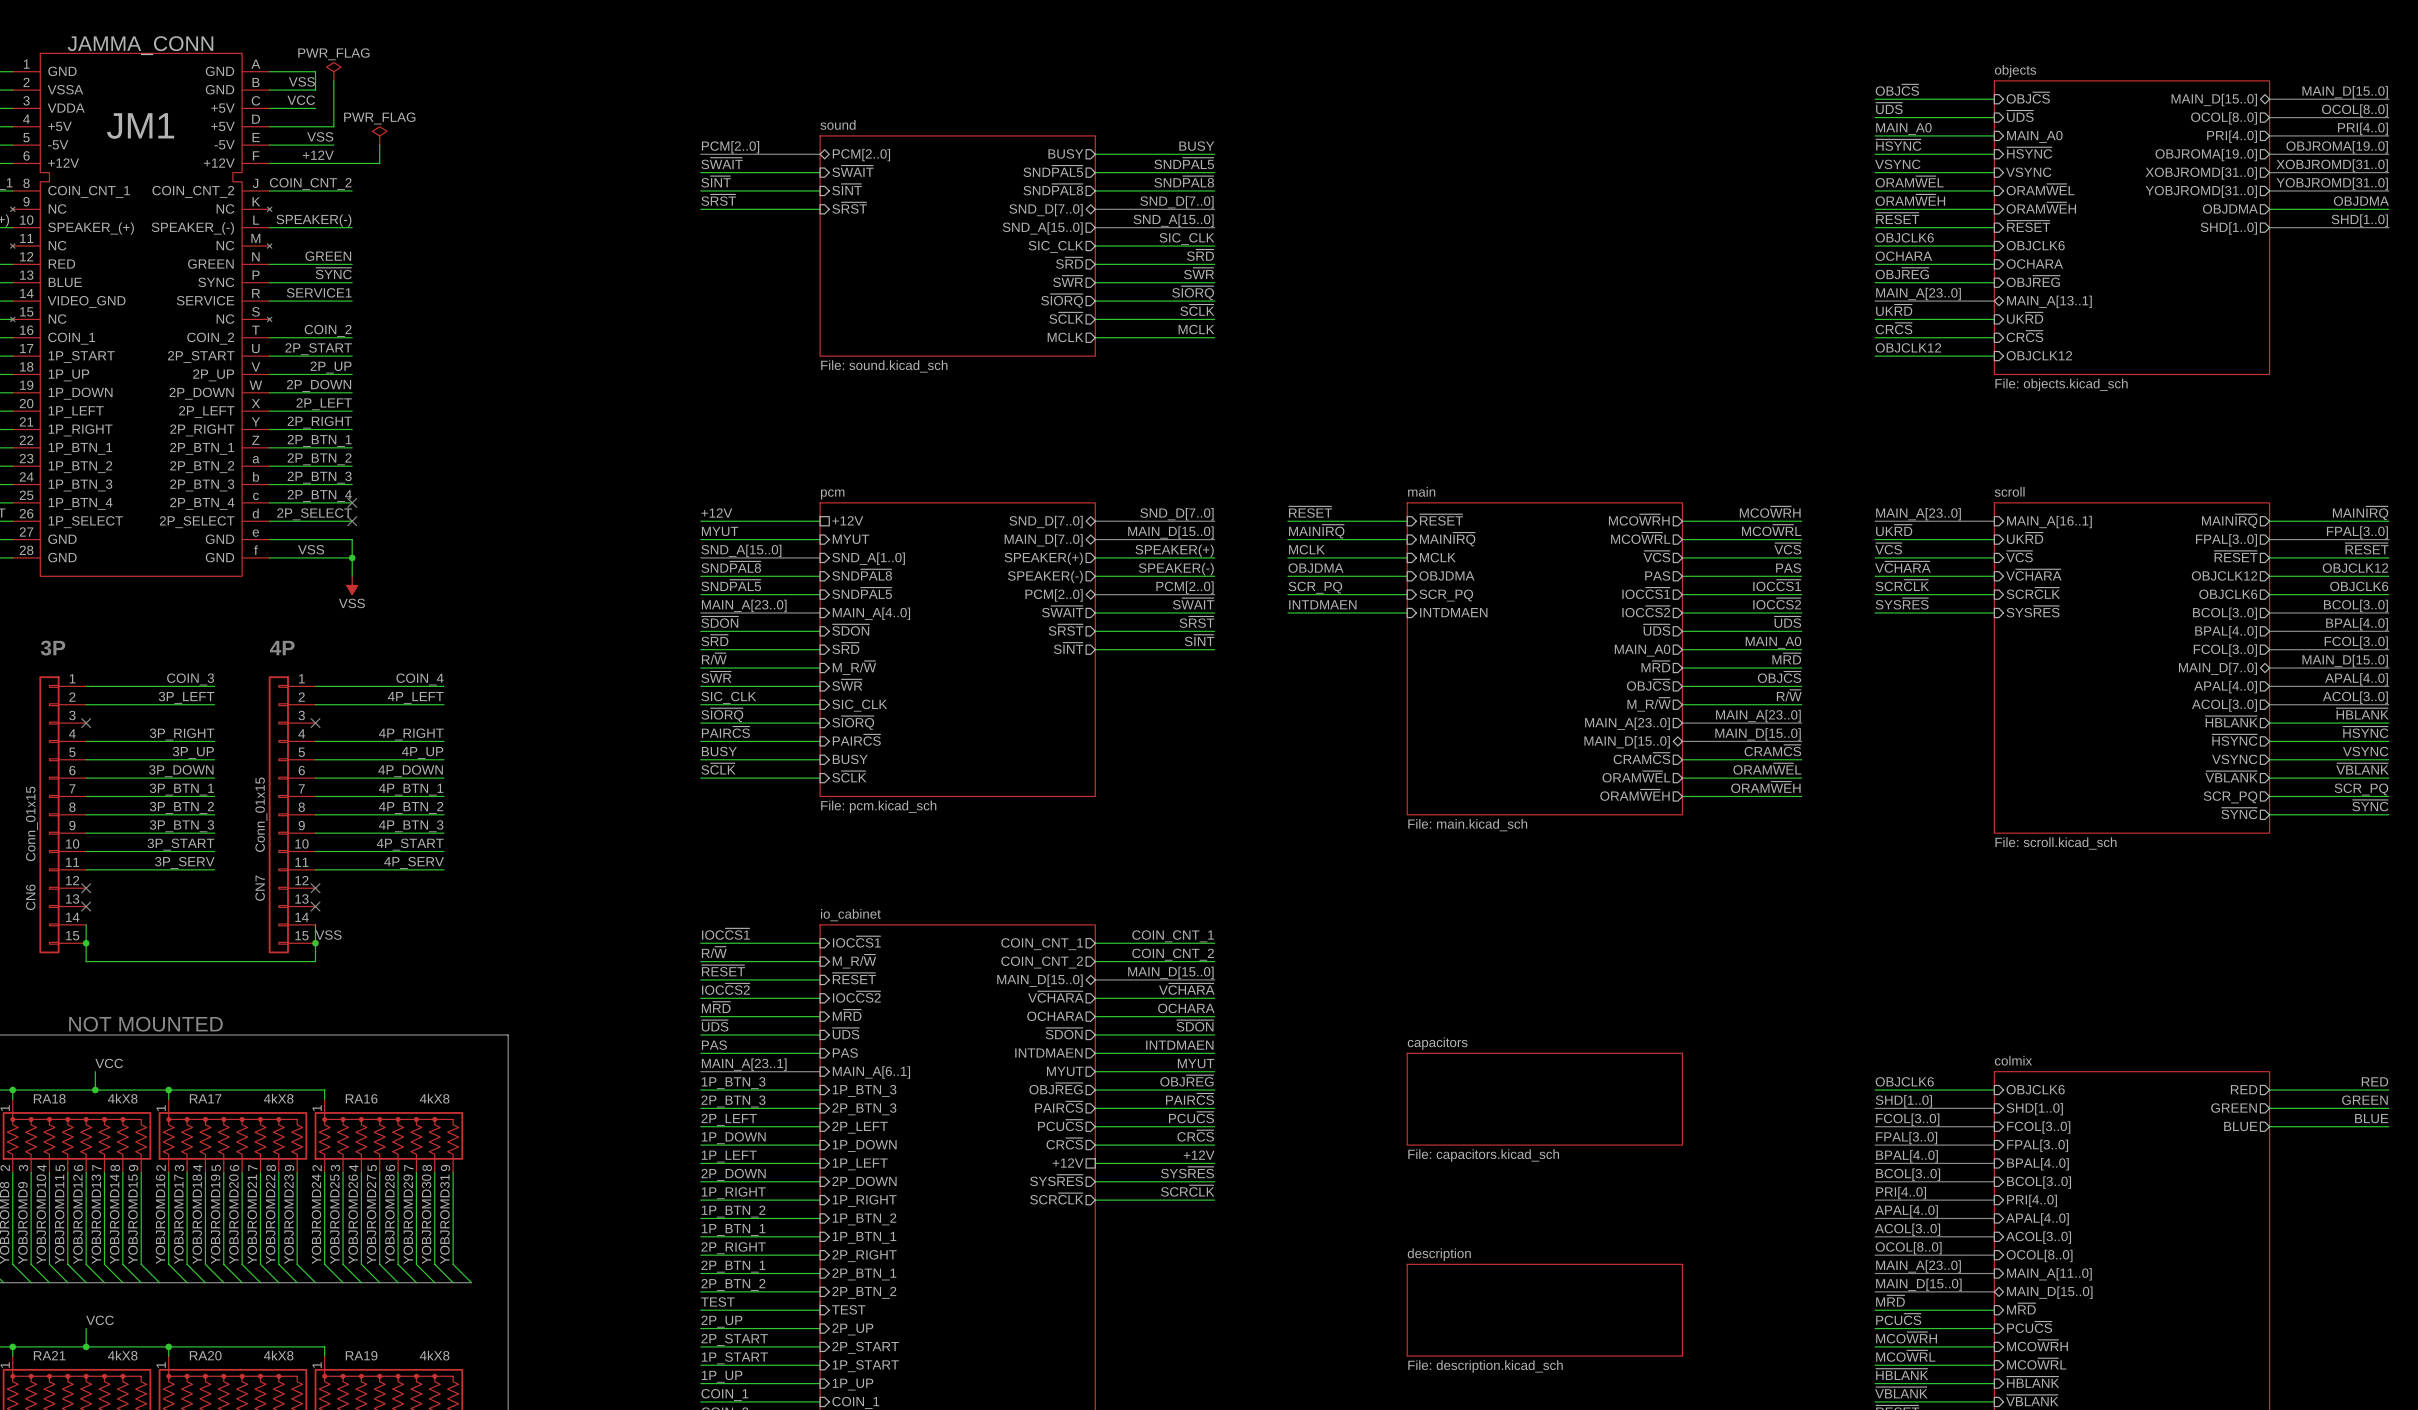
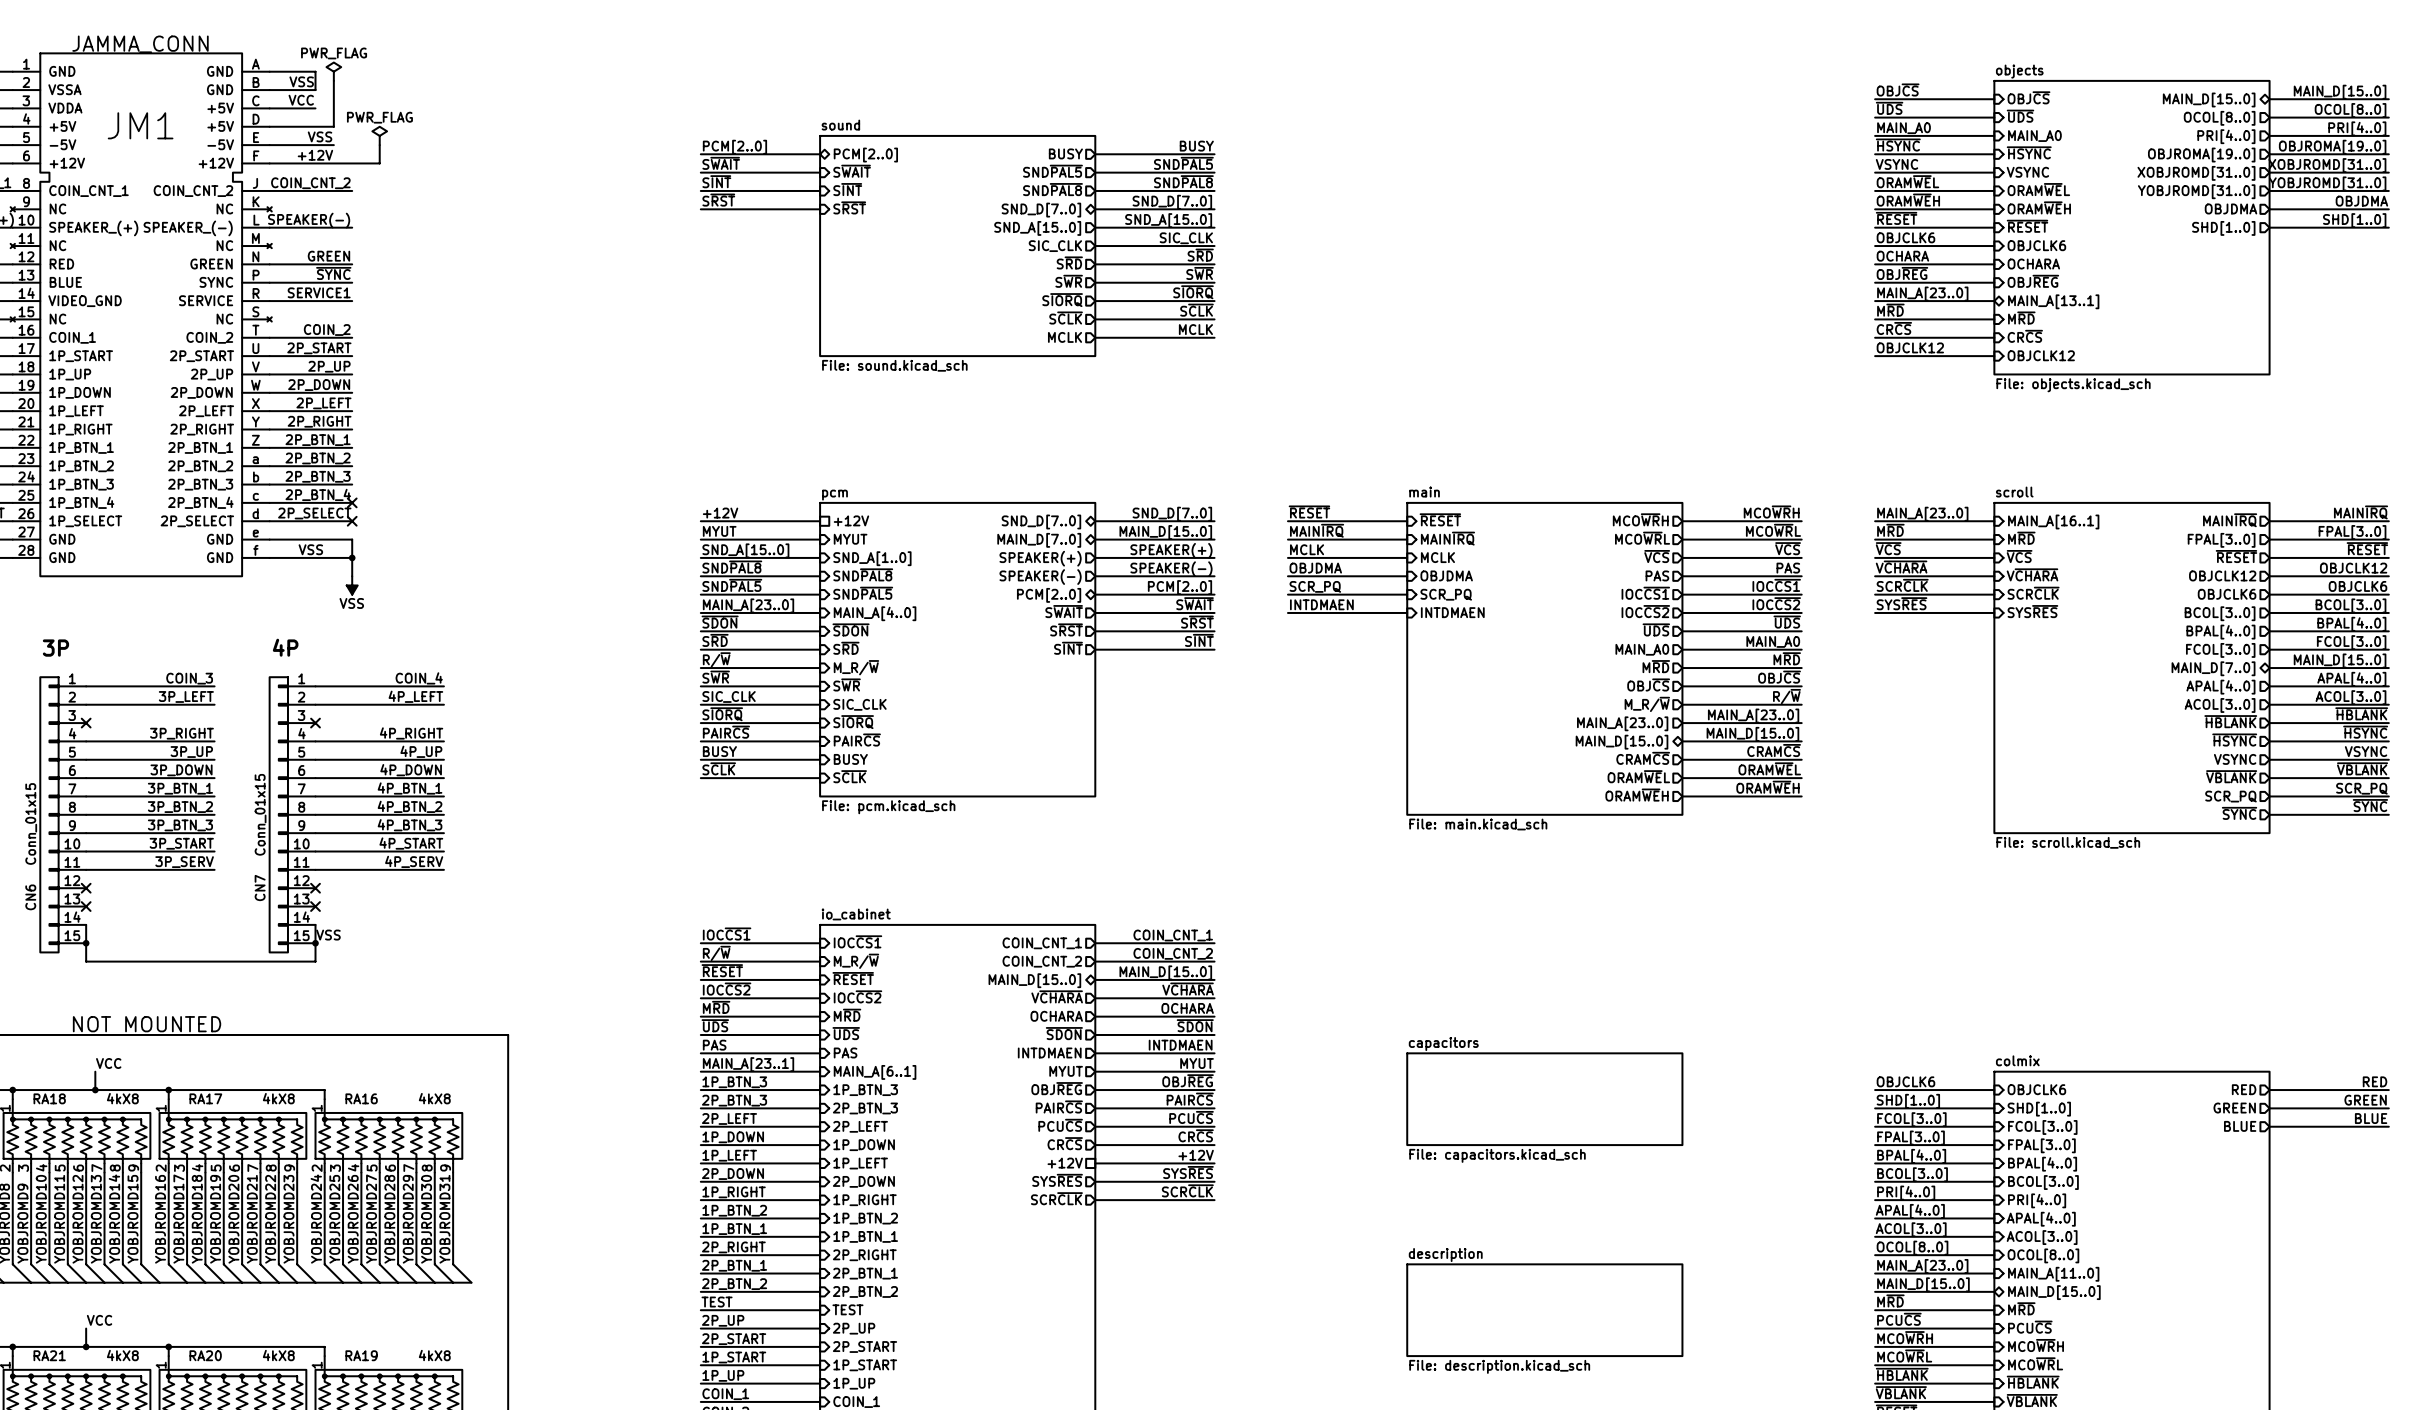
label: UK~{RD} (1894, 310) -> M~{RD} (1890, 310)
sheet pin: UK~{RD} (2025, 318) -> M~{RD} (2021, 318)
label: UK~{RD} (1894, 530) -> M~{RD} (1890, 530)
sheet pin: UK~{RD} (2025, 538) -> M~{RD} (2021, 538)

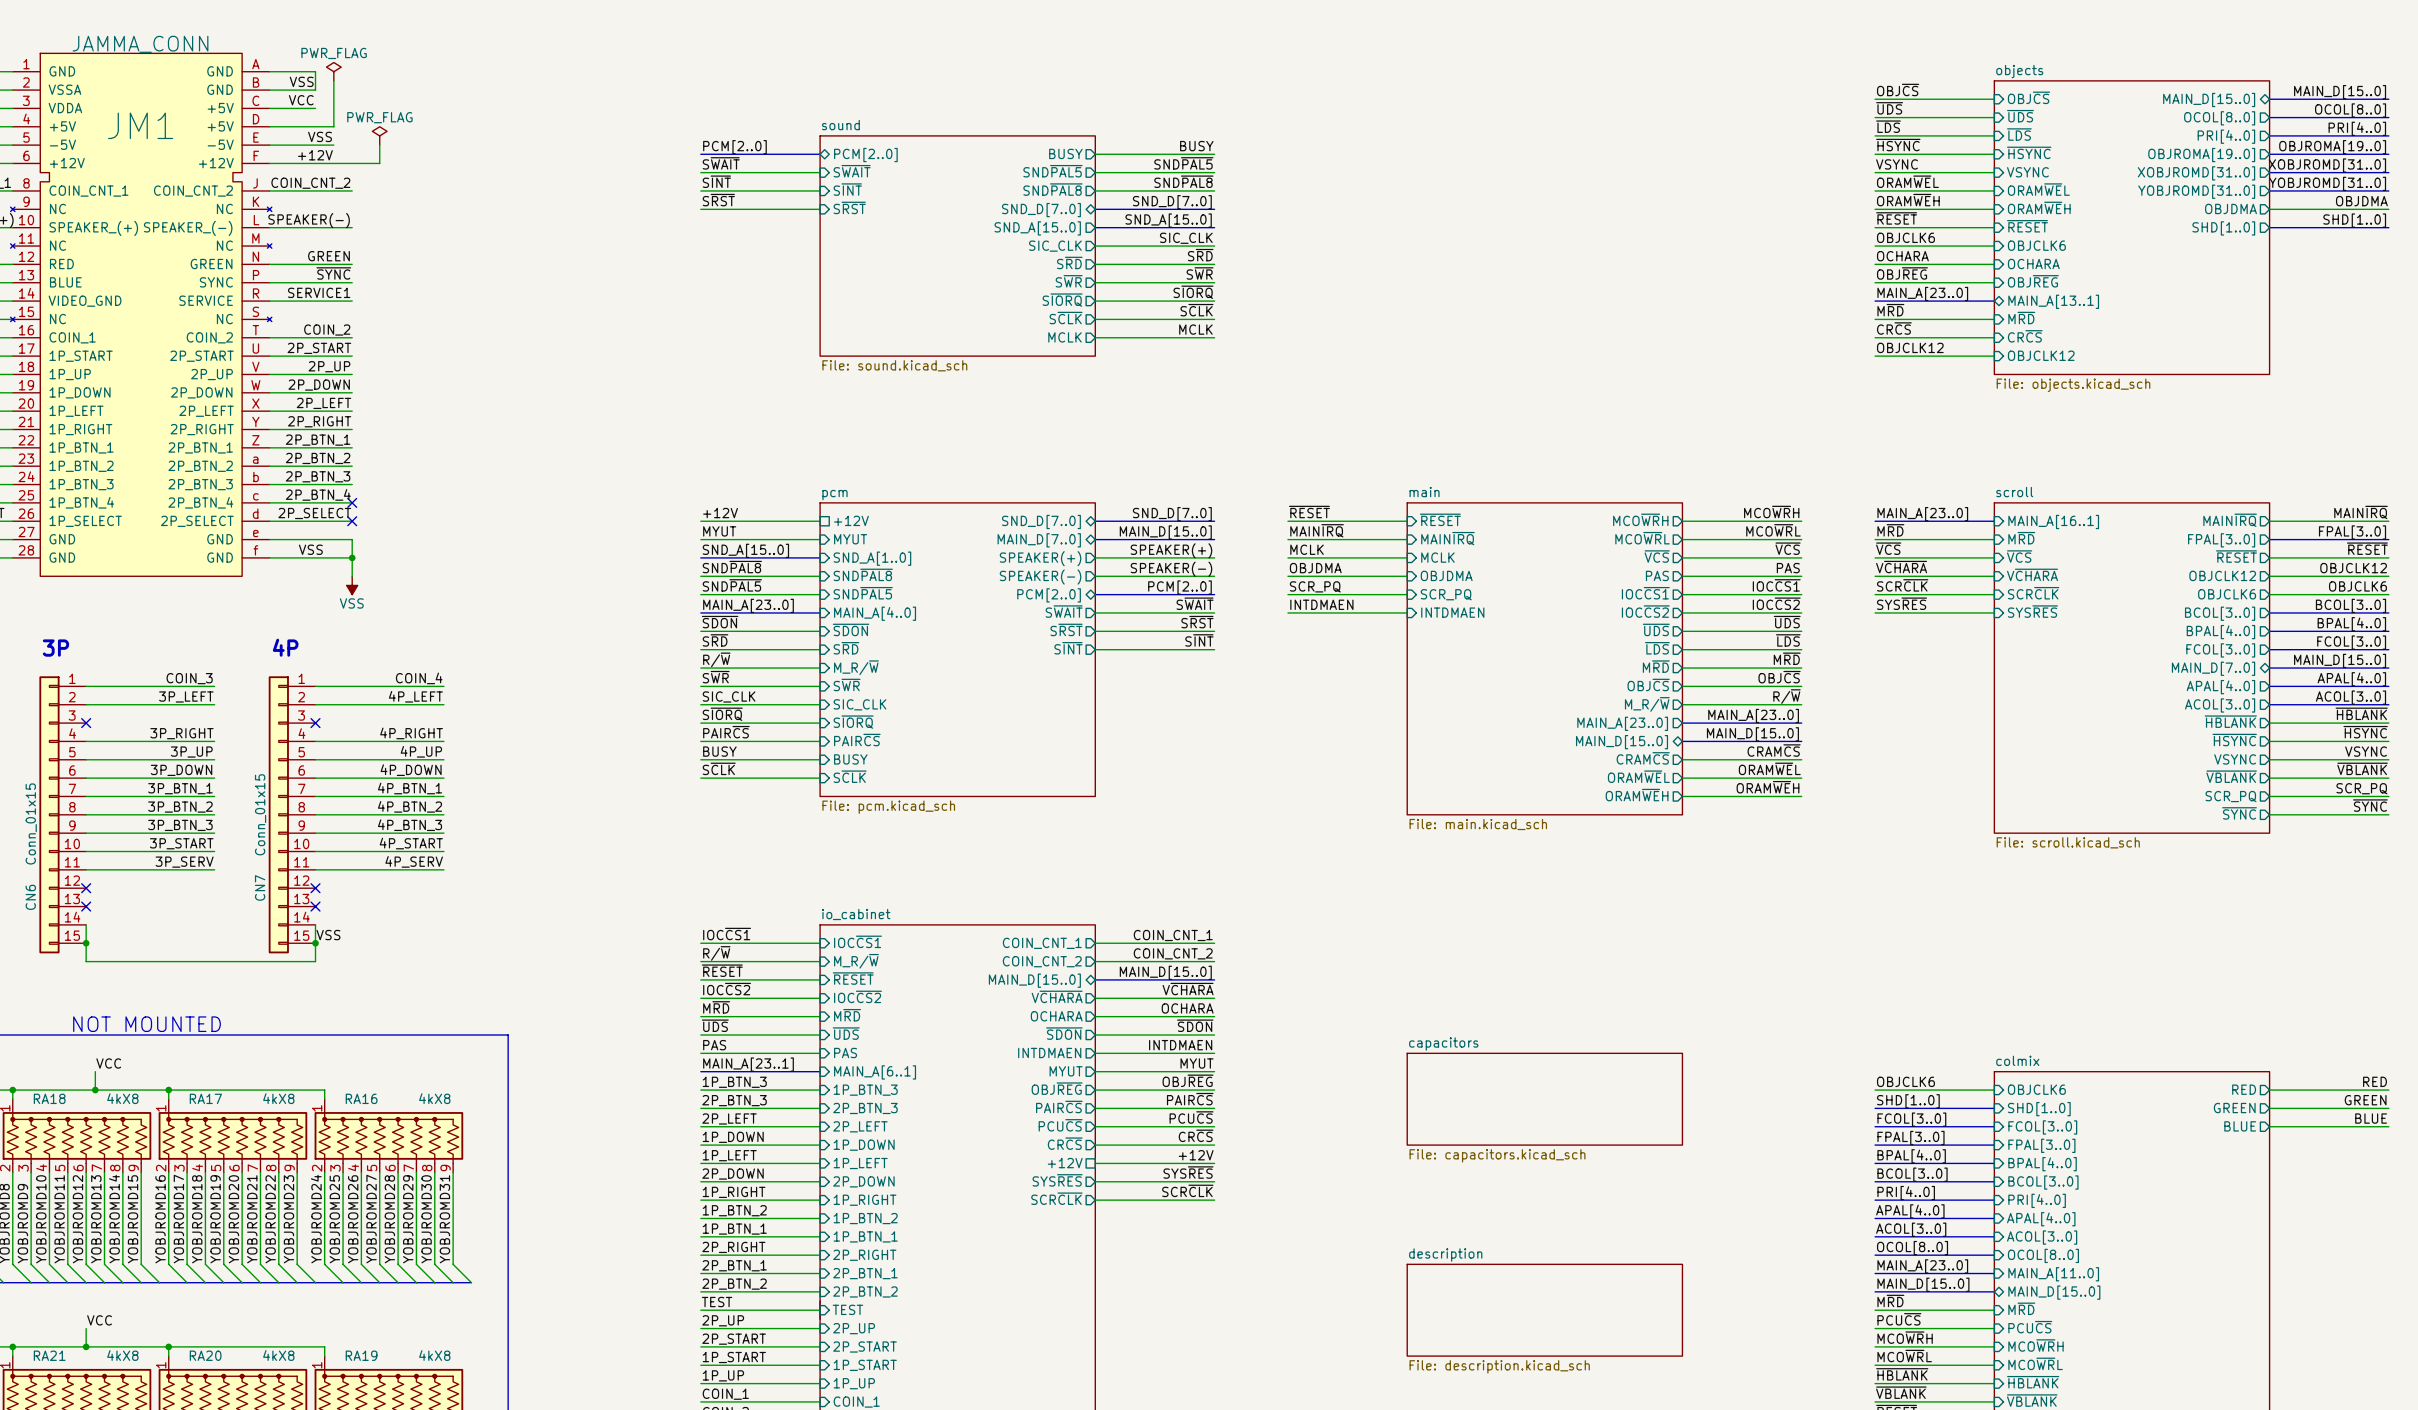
label: MAIN_A0 (1904, 128) -> ~{LDS} (1888, 126)
sheet pin: MAIN_A0 (2034, 136) -> ~{LDS} (2019, 134)
label: MAIN_A0 (1773, 641) -> ~{LDS} (1788, 640)
sheet pin: MAIN_A0 (1642, 649) -> ~{LDS} (1657, 648)

